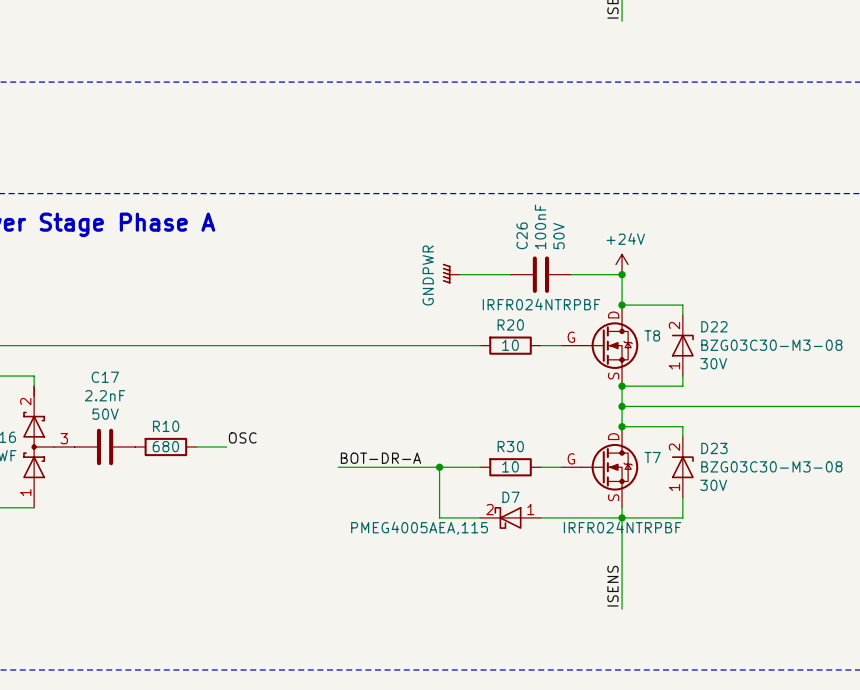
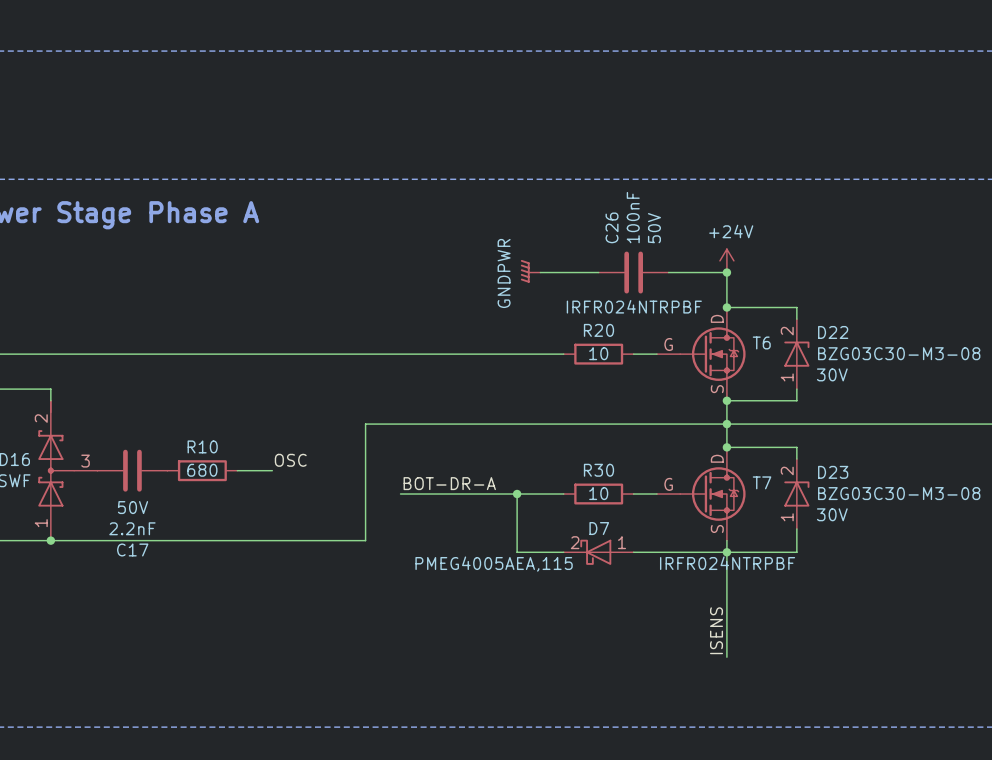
T8 name: T8 (652, 335) -> T6 (761, 342)
C17 name position: C17 (105, 377) -> C17 (132, 549)
C17 text position: 2.2nF (105, 395) -> 2.2nF (132, 528)
wire: none -> (726, 424) (365, 424) (365, 540) (50, 540)
C17 text position: 50V (105, 414) -> 50V (133, 507)
junction: none -> (50, 540)

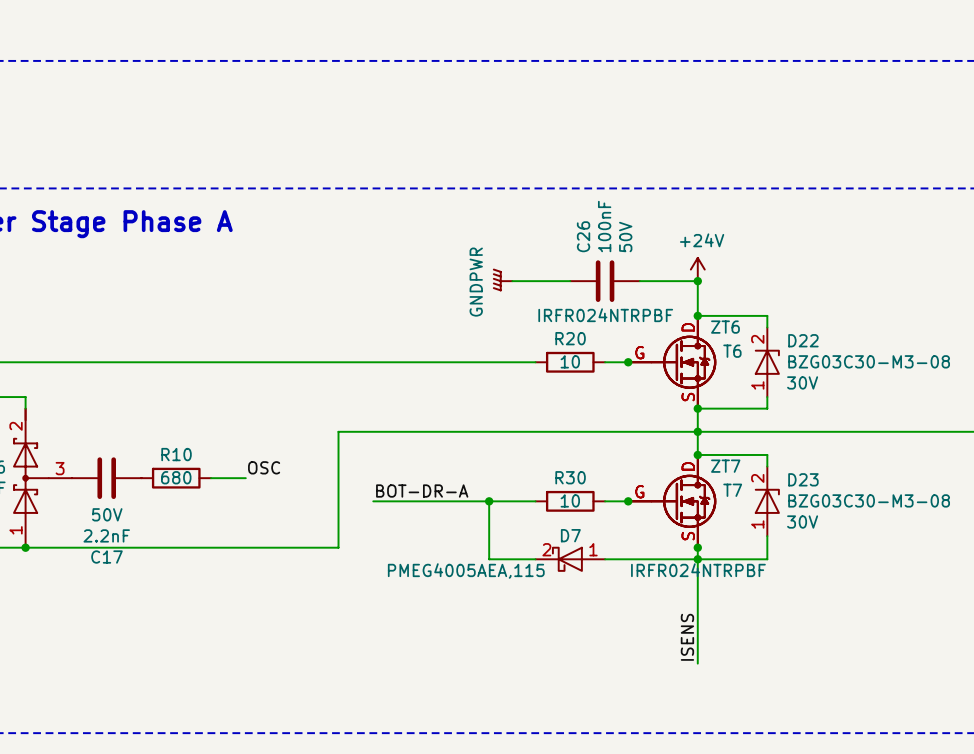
junction: none -> (628, 362)
ZT6: none -> (672, 362)
junction: none -> (628, 501)
ZT7: none -> (672, 501)
junction: none -> (697, 547)

